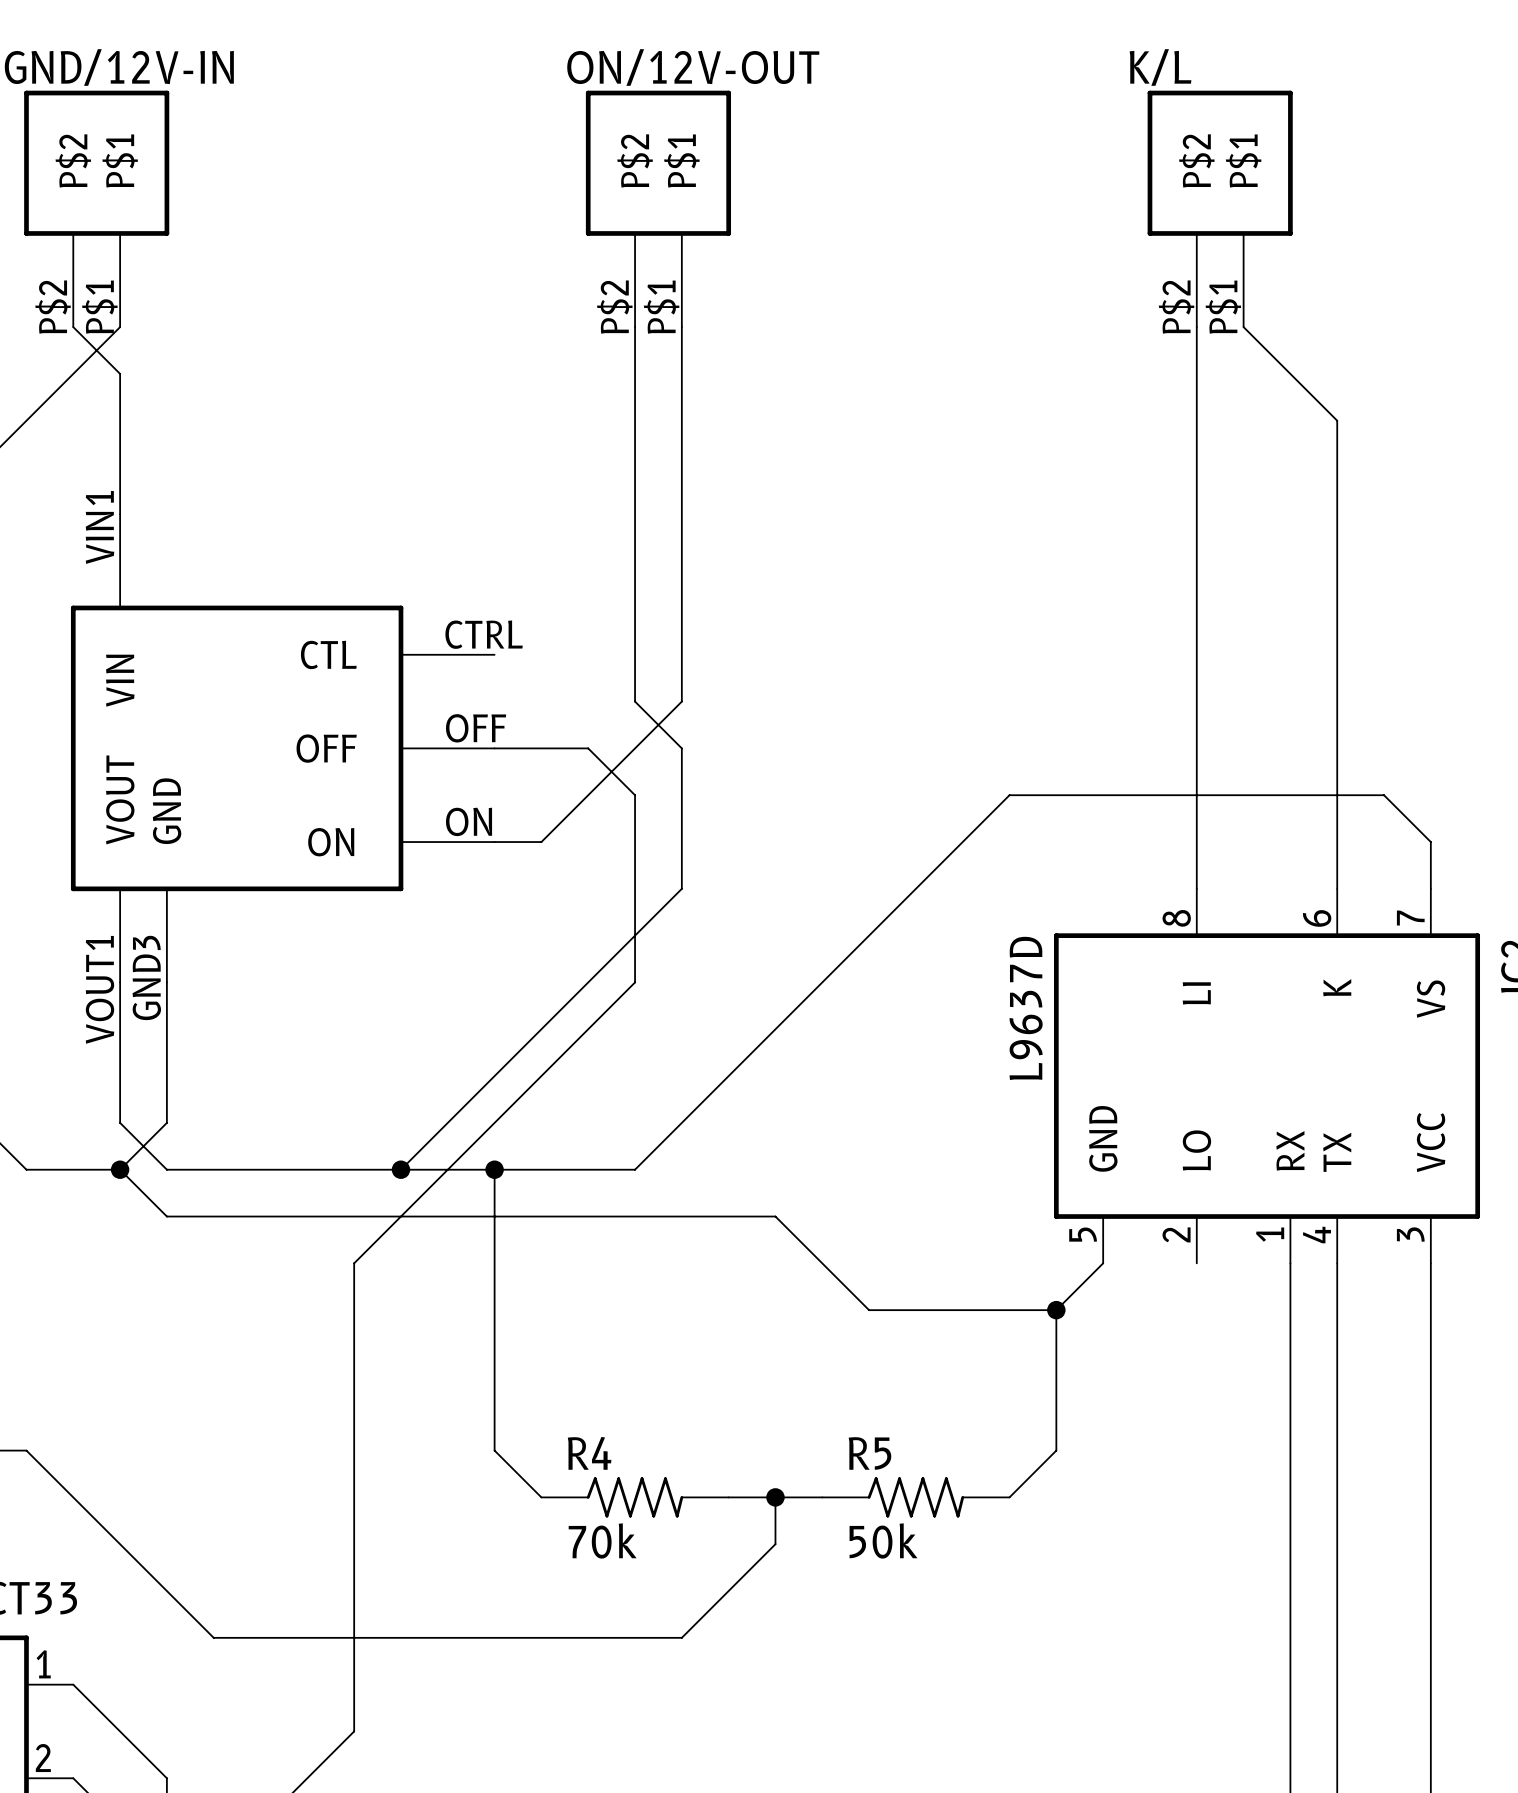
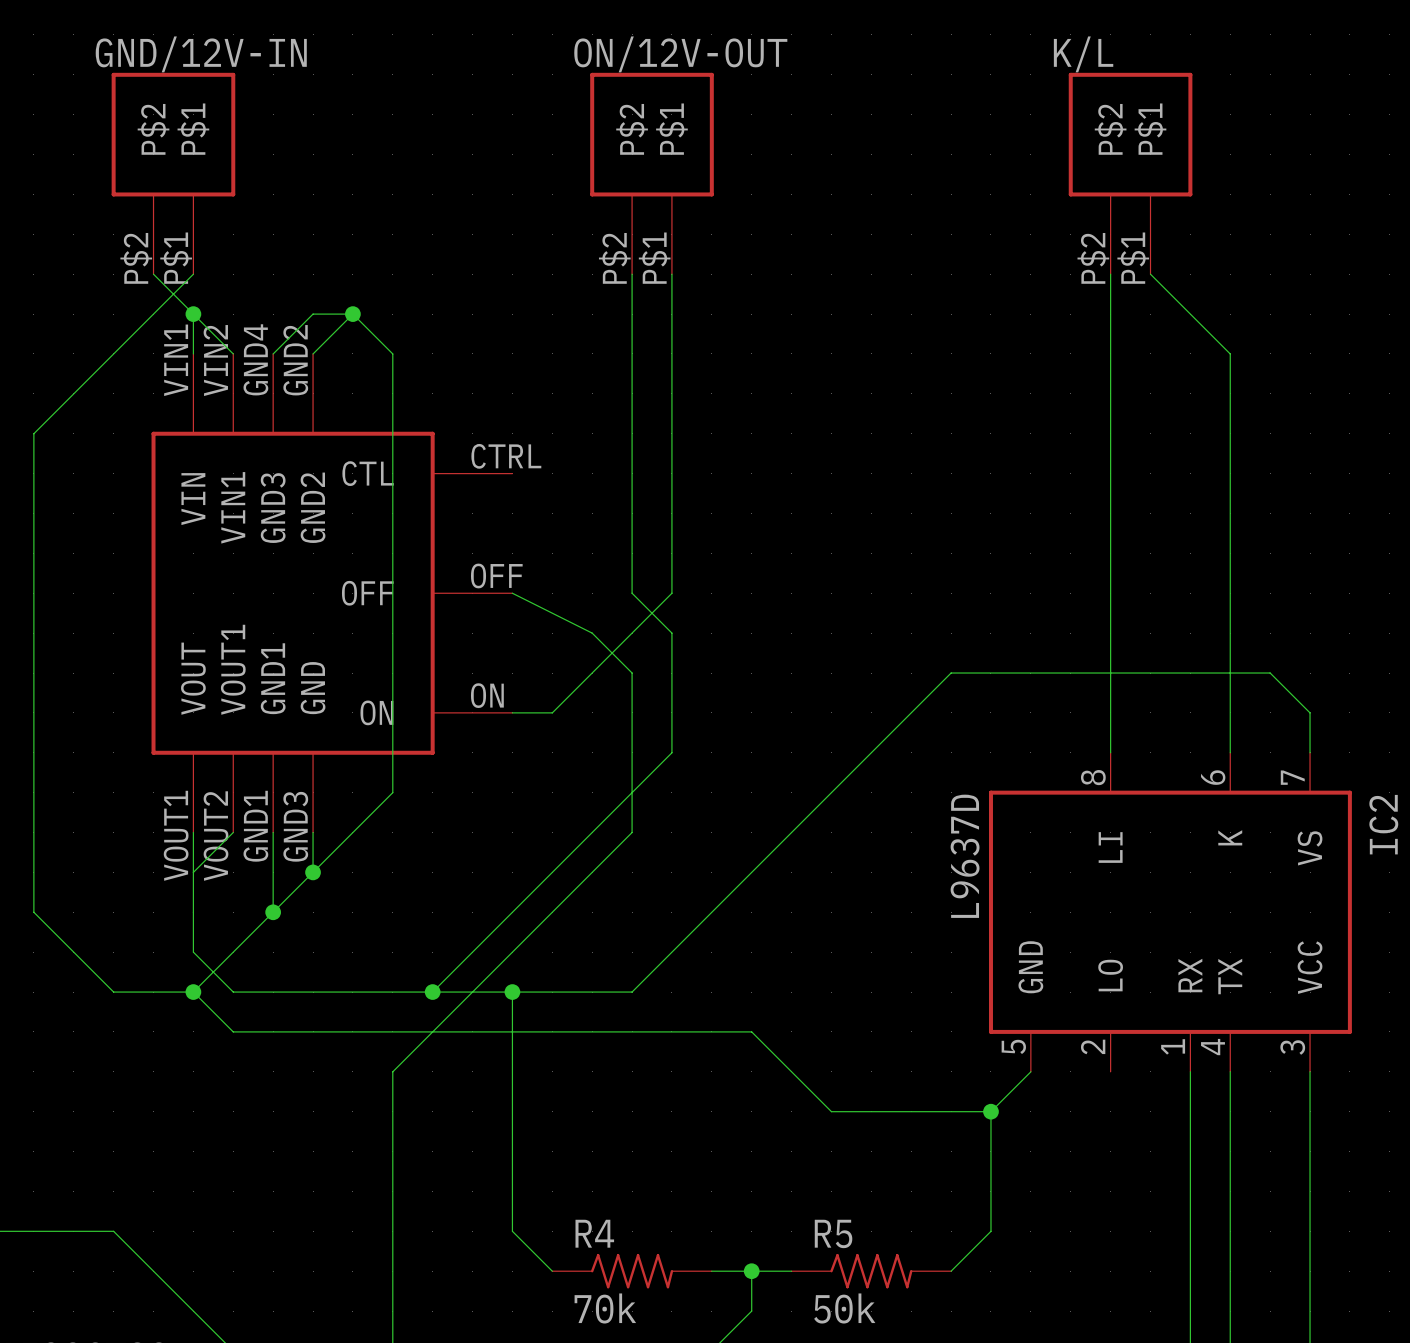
wire: none -> (193, 314) (233, 353)
junction: none -> (193, 314)
wire: none -> (352, 314) (313, 353)
wire: none -> (352, 314) (392, 353) (392, 792) (233, 952)
wire: none -> (352, 314) (313, 314) (273, 353)
junction: none -> (352, 314)
part: none -> (331, 593)
part: (282, 748) -> none
wire: (494, 748) (588, 748) -> (512, 593) (592, 633)
wire: (166, 982) (166, 1122) -> (233, 832) (193, 872)
wire: none -> (273, 832) (273, 912)
wire: none -> (313, 832) (313, 872)
junction: none -> (313, 872)
junction: none -> (273, 912)

